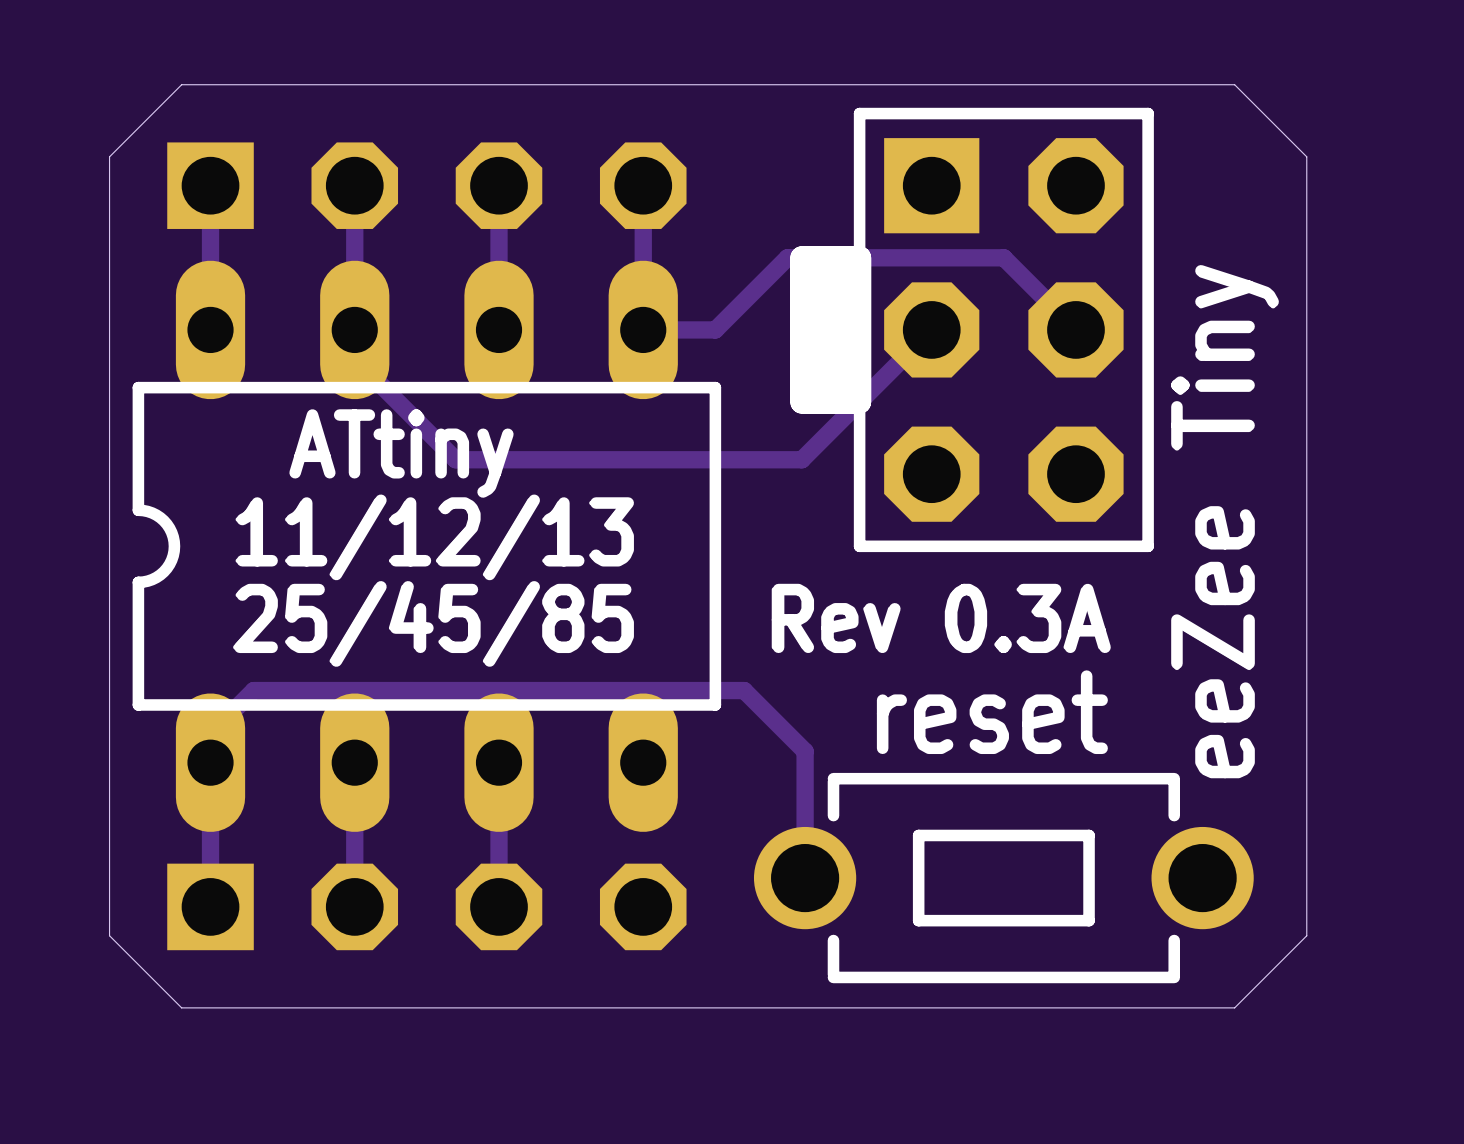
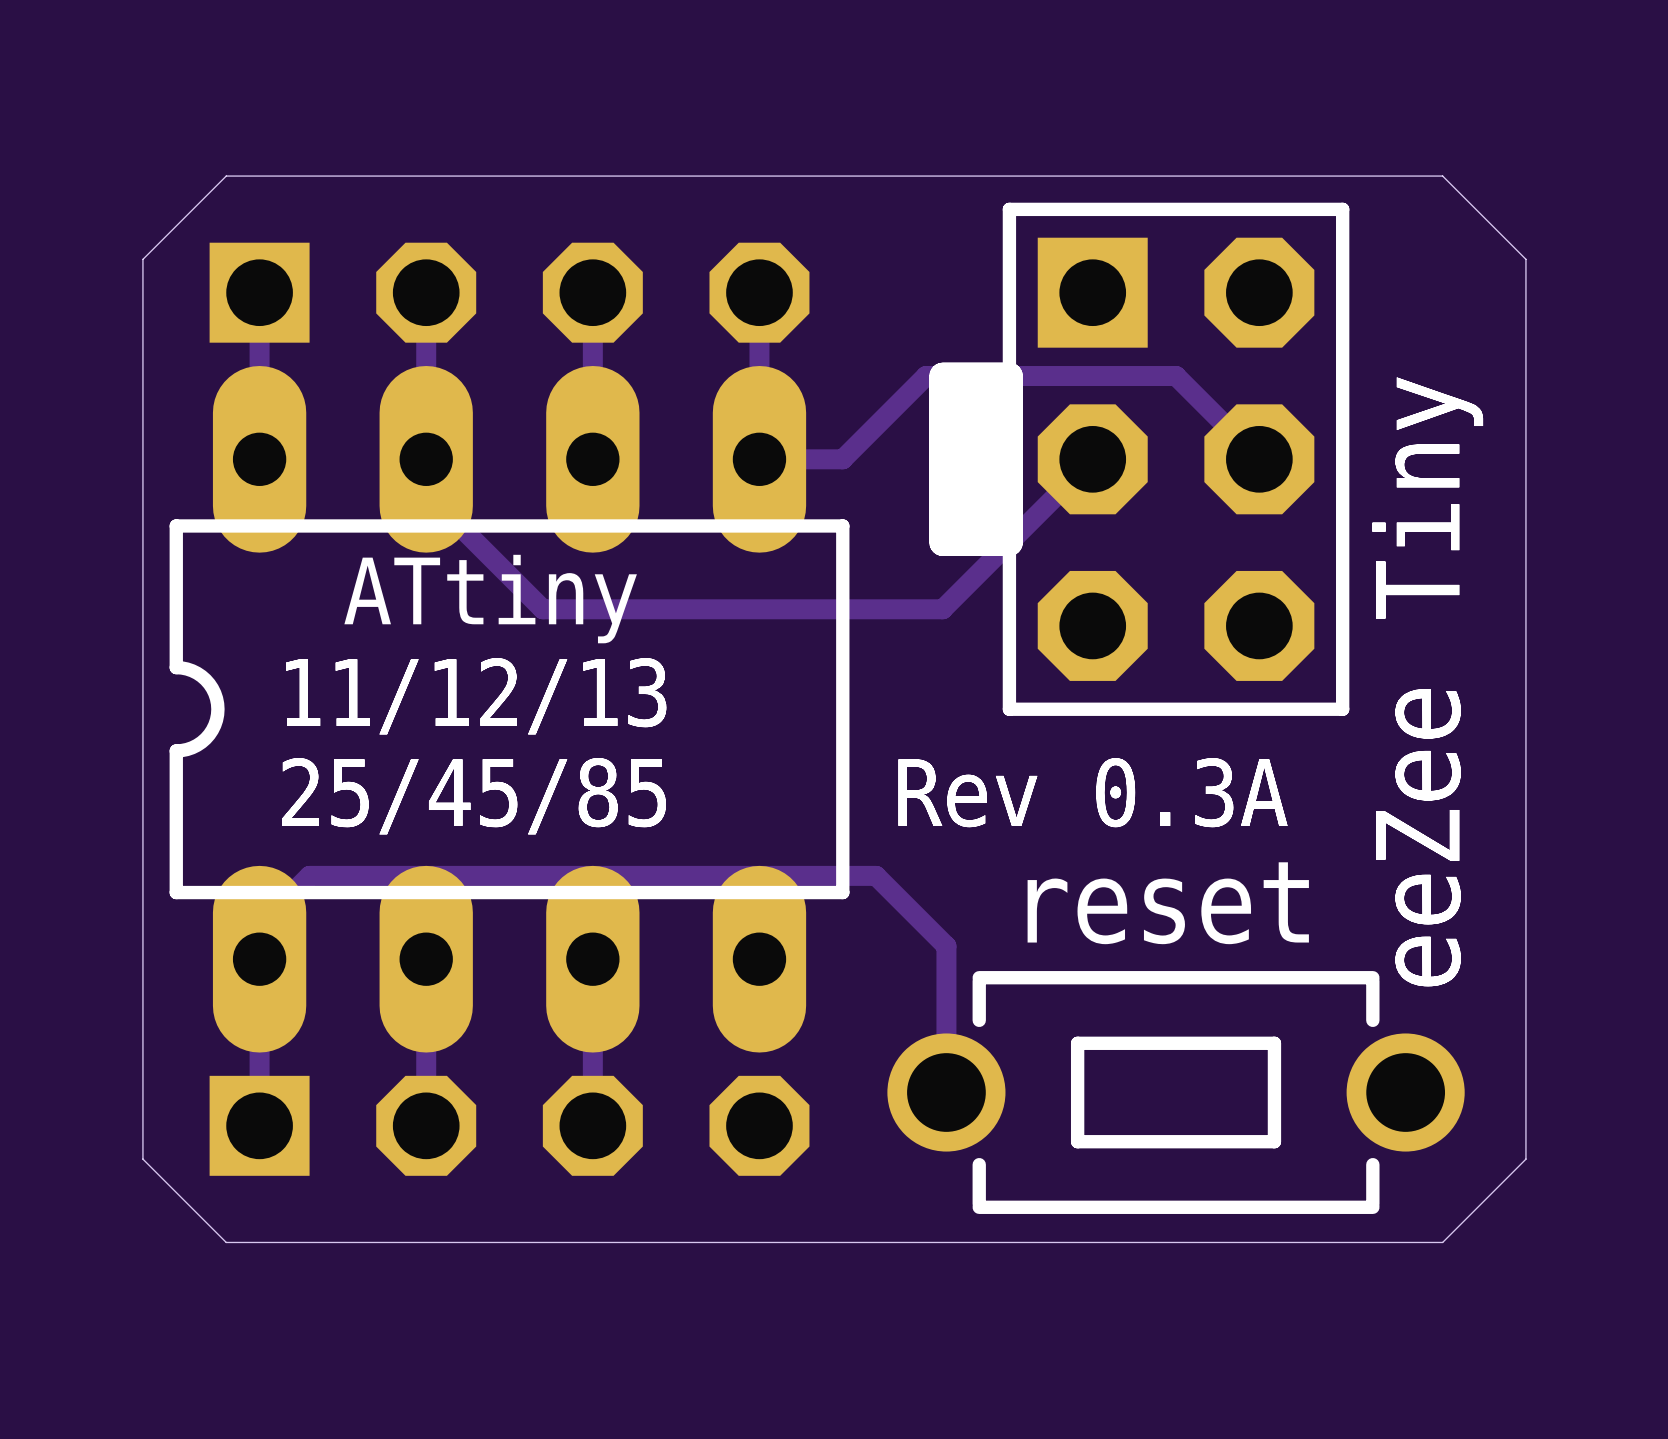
part footprint: [134, 260, 720, 832] -> [171, 366, 848, 1053]

